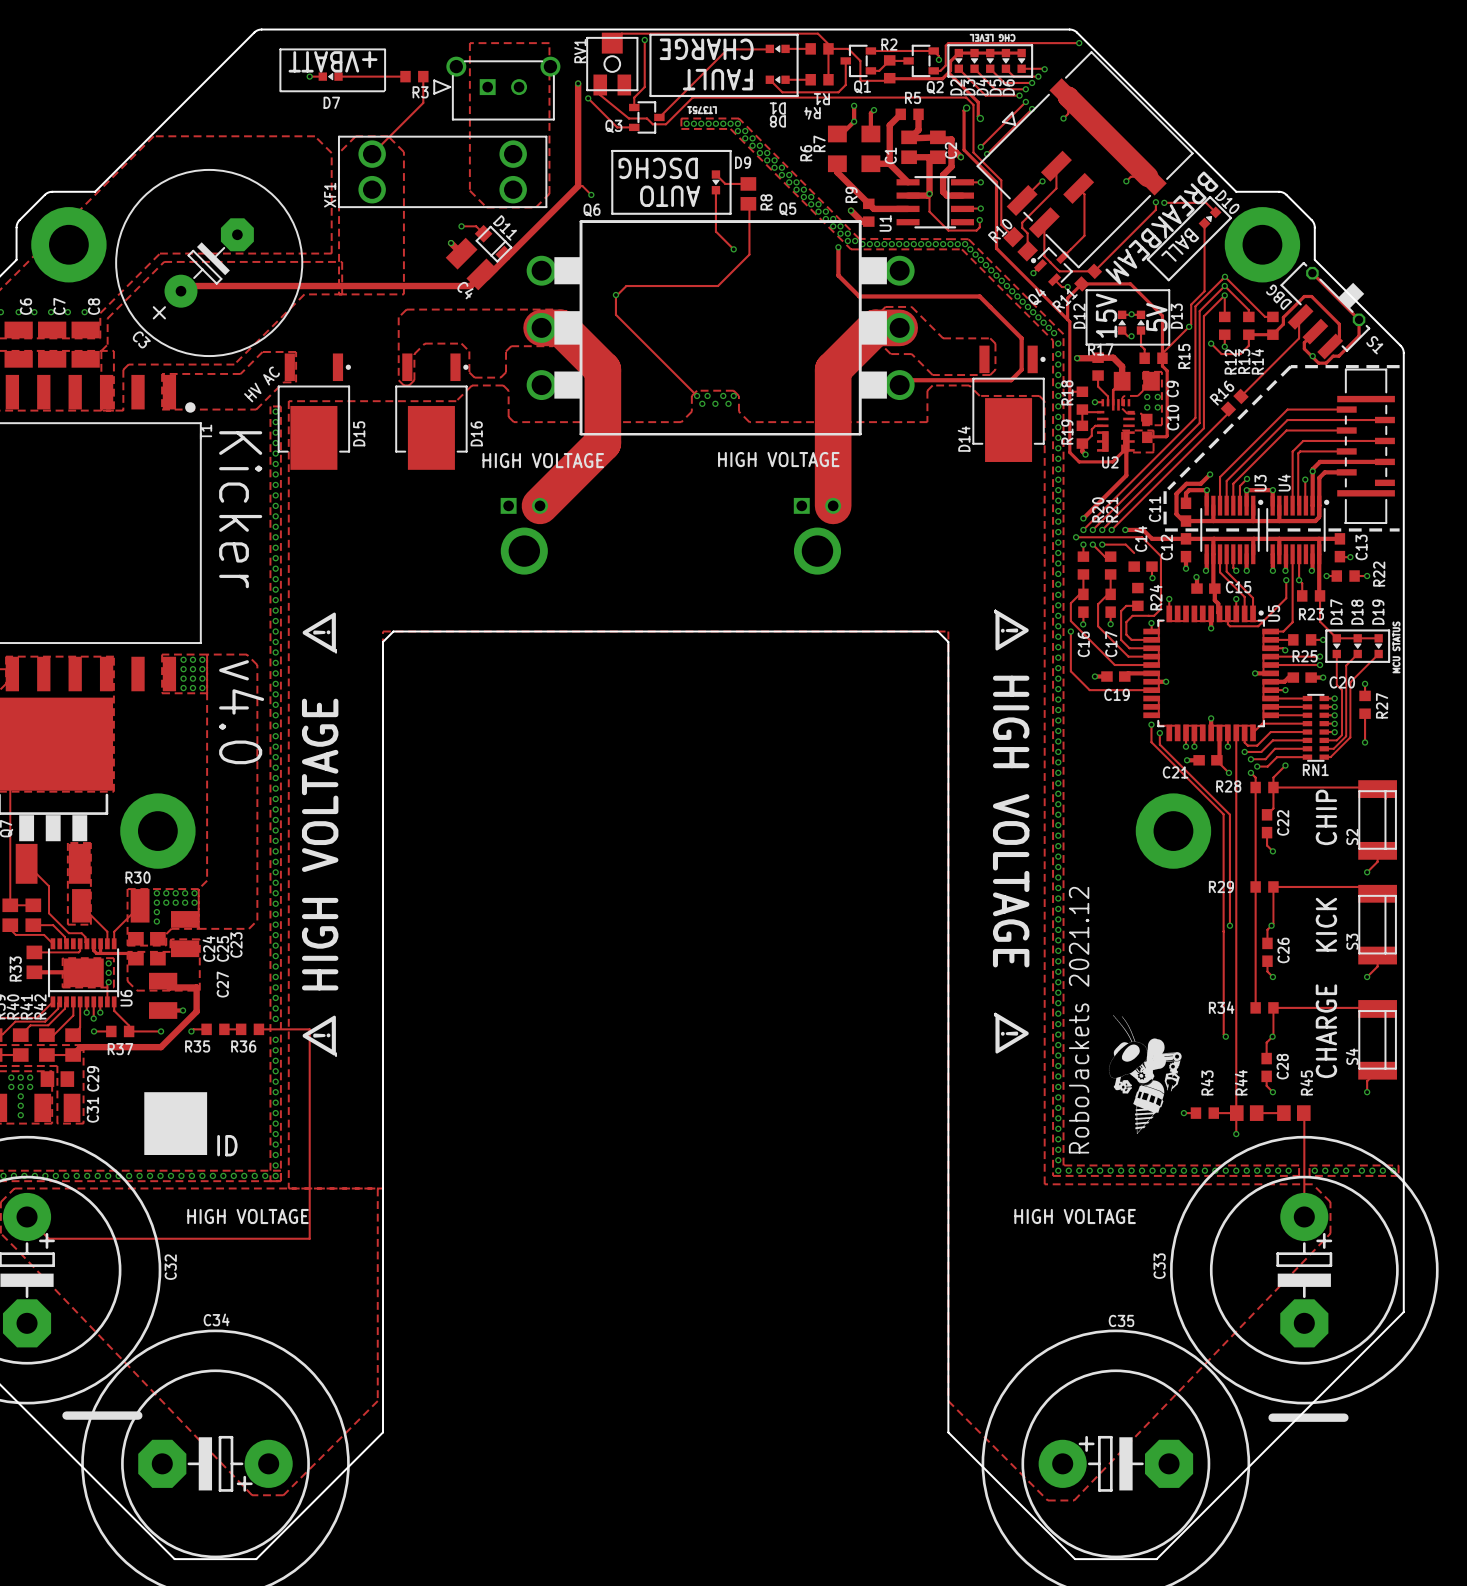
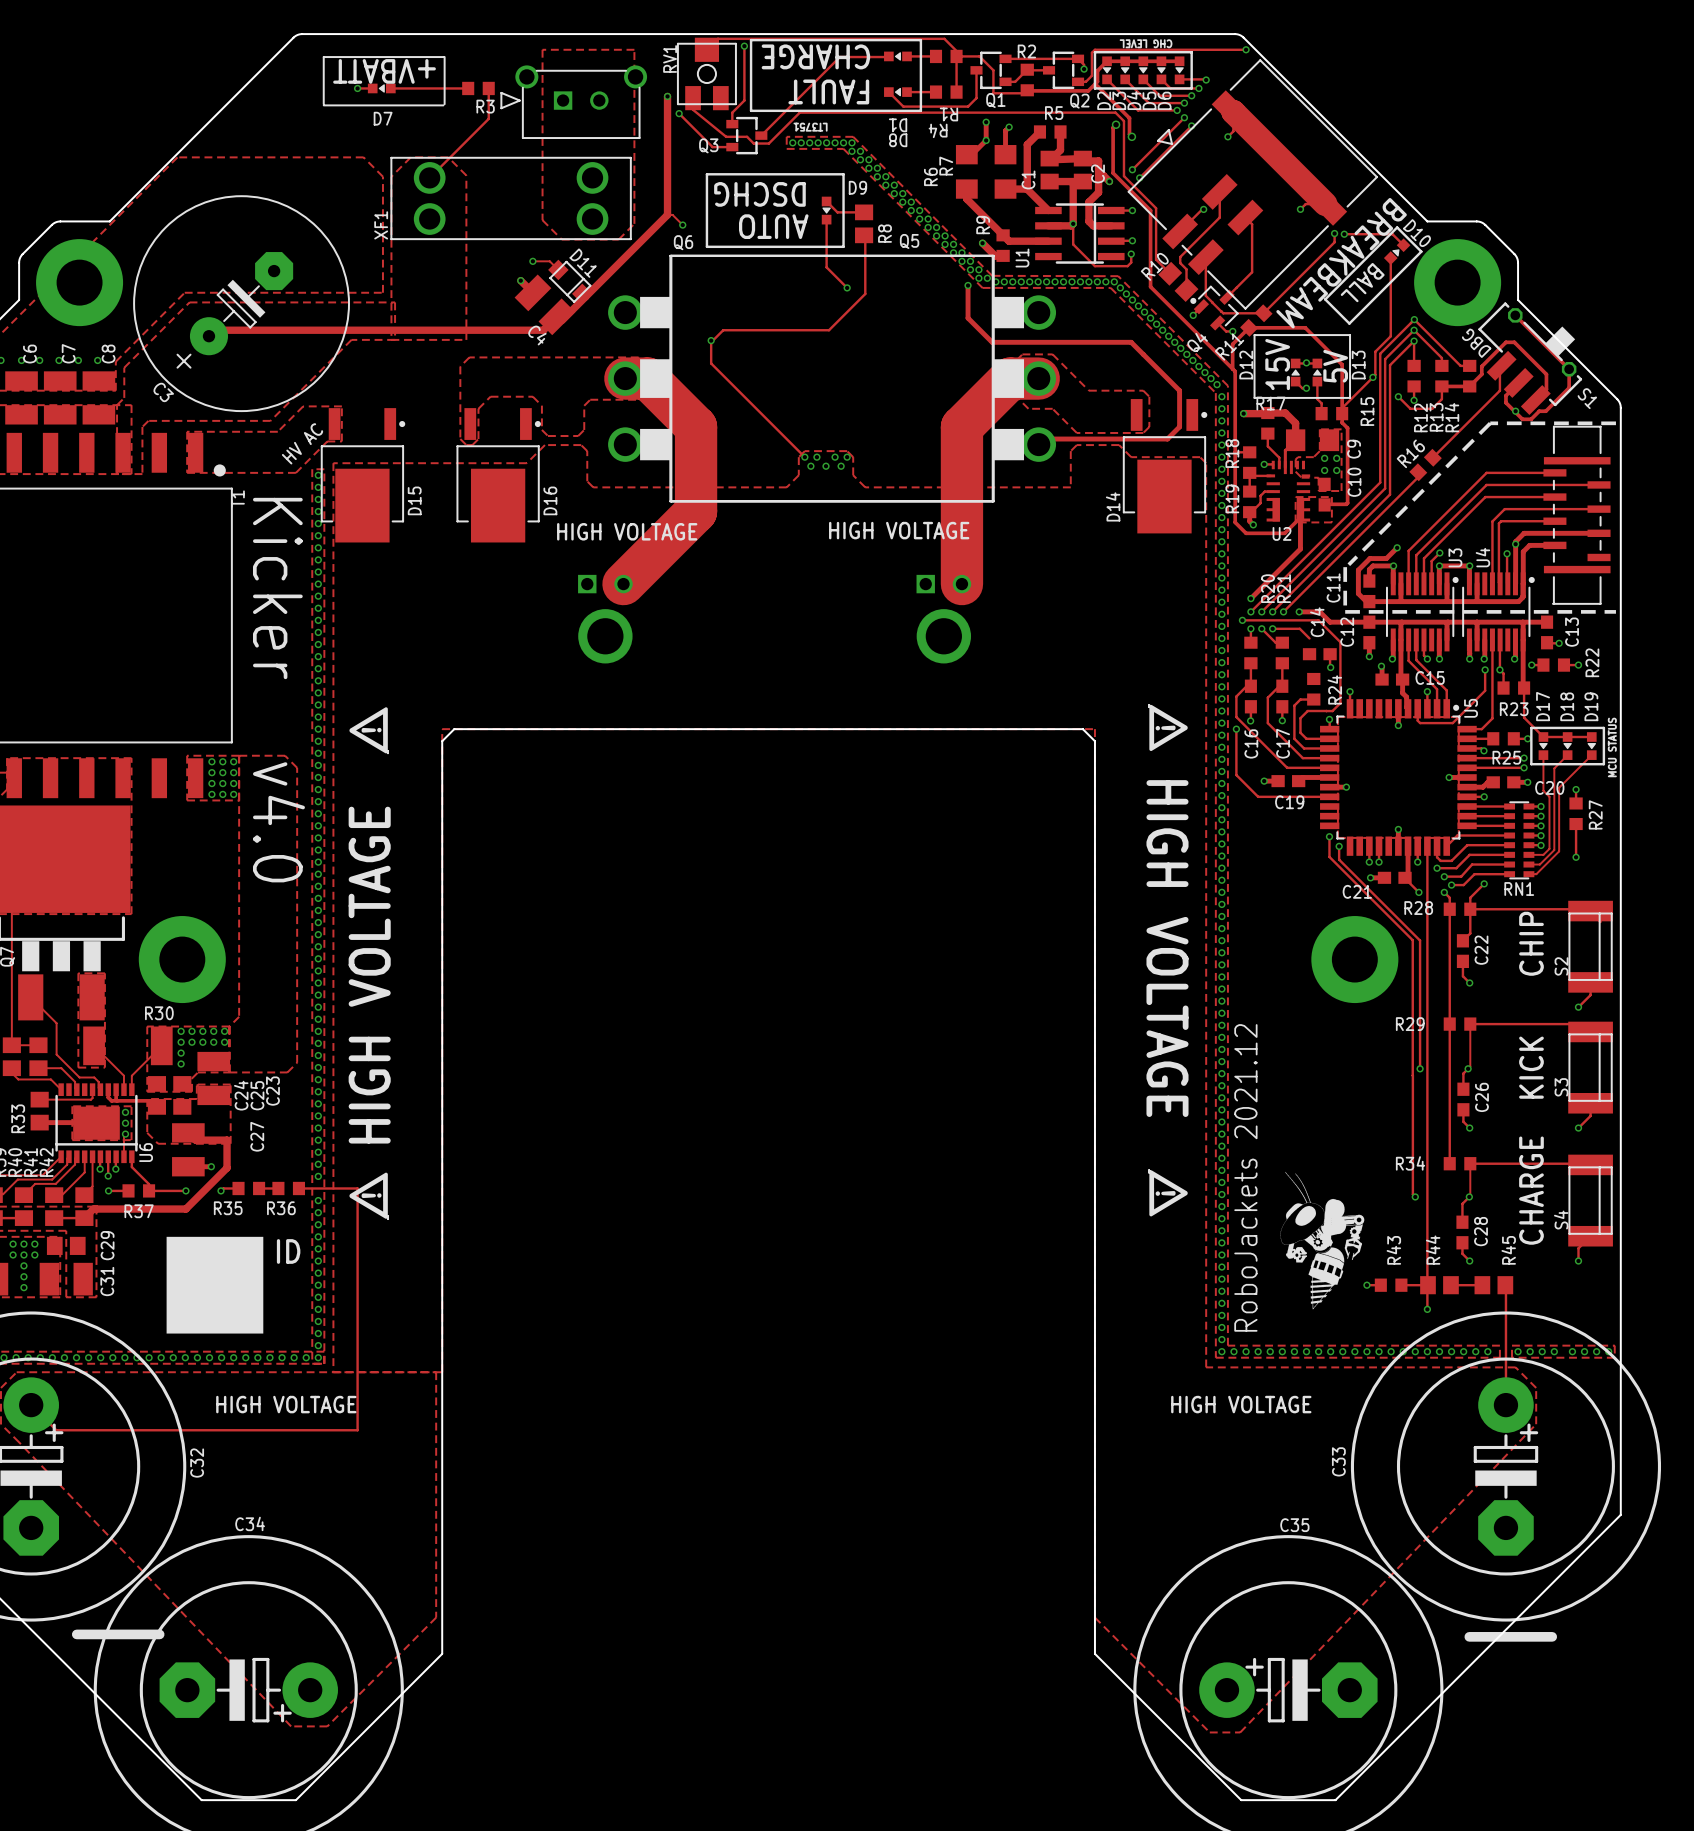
drawing: none -> [166, 1236, 264, 1334]
drawing: [144, 1092, 208, 1155] -> none
text position: ID (227, 1145) -> ID (288, 1251)

